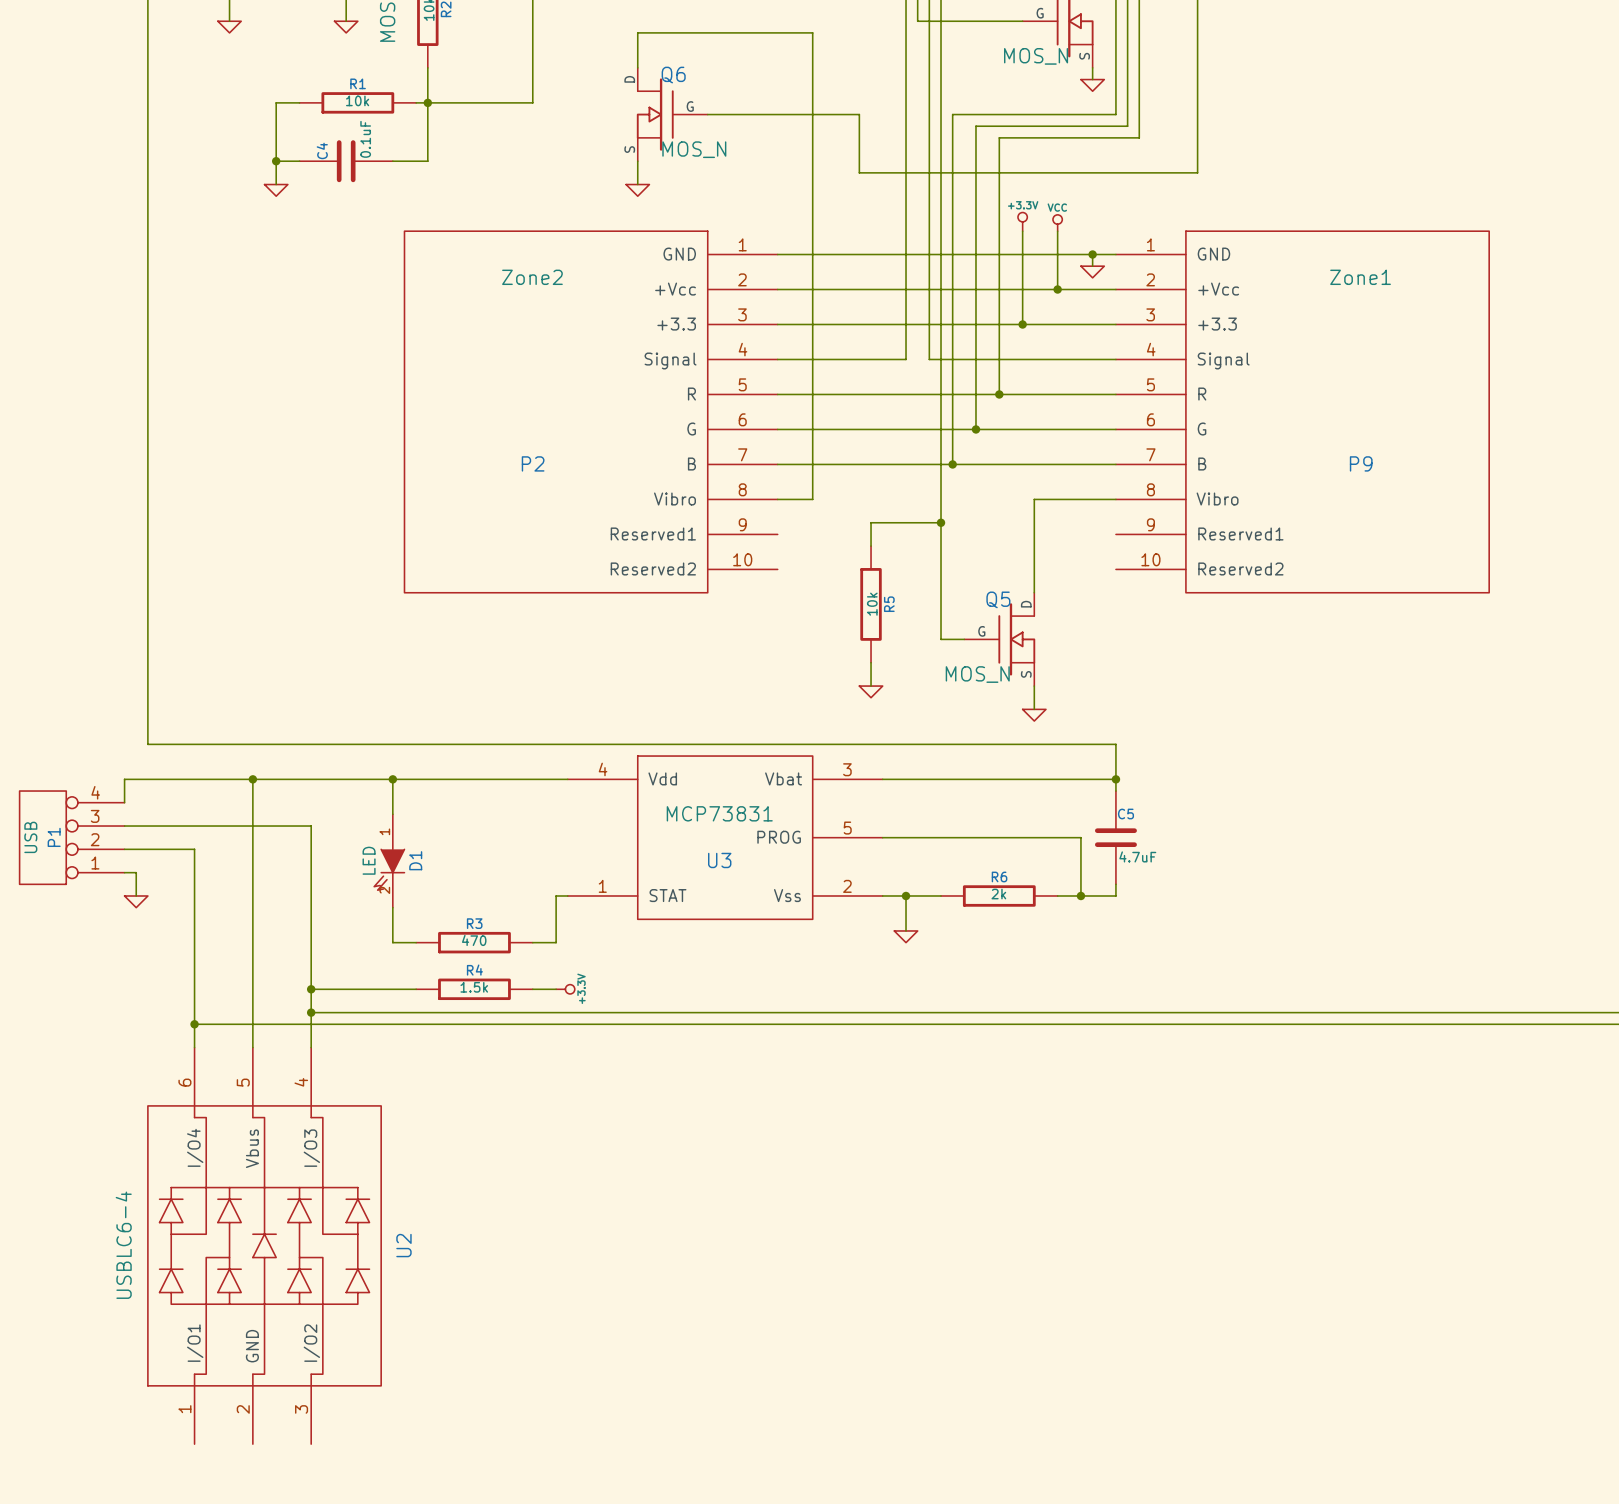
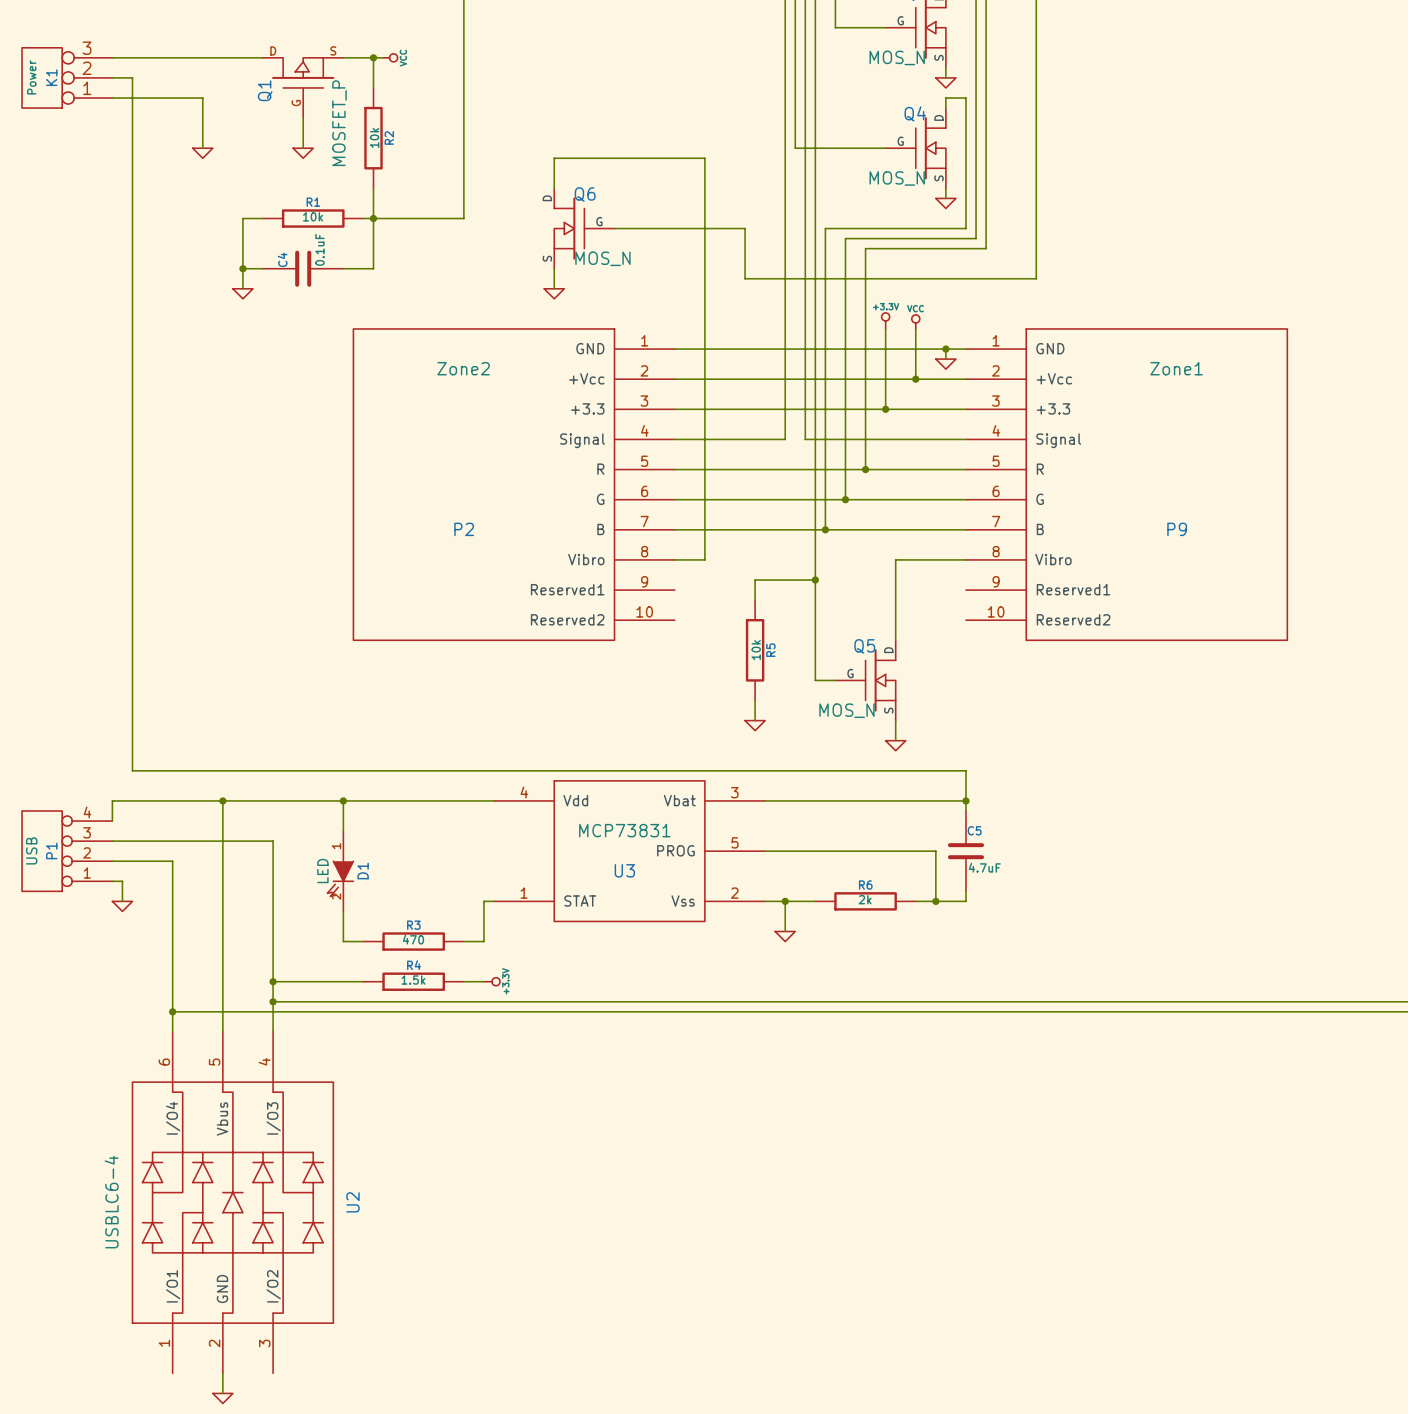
wire: none -> (222, 1373) (222, 1393)
power symbol: none -> (222, 1398)

